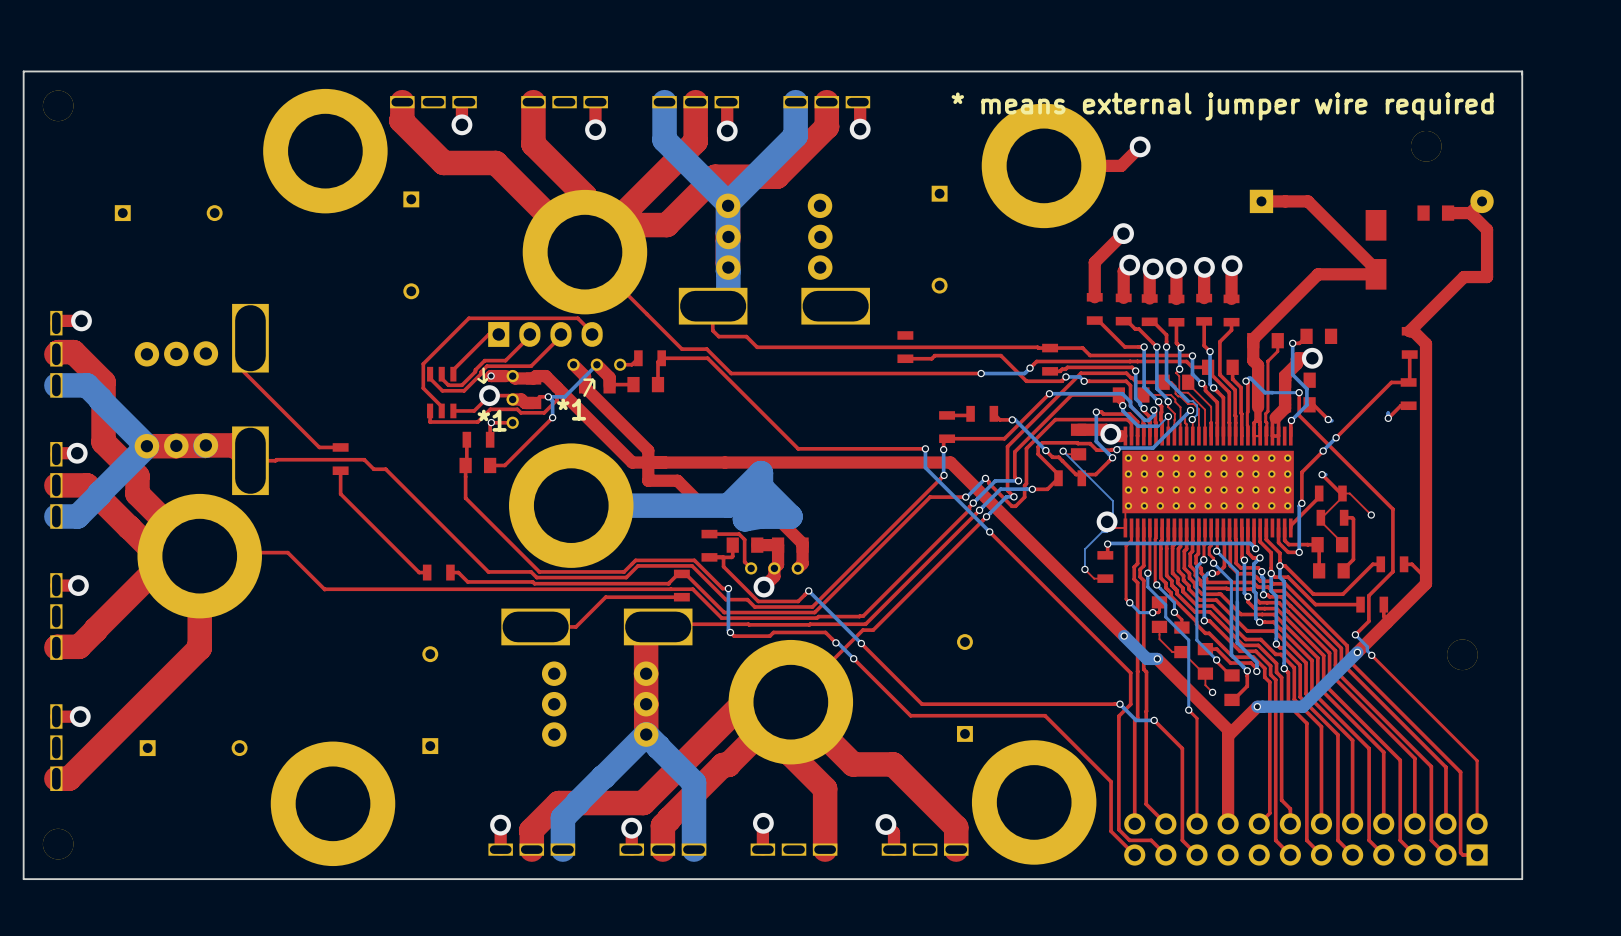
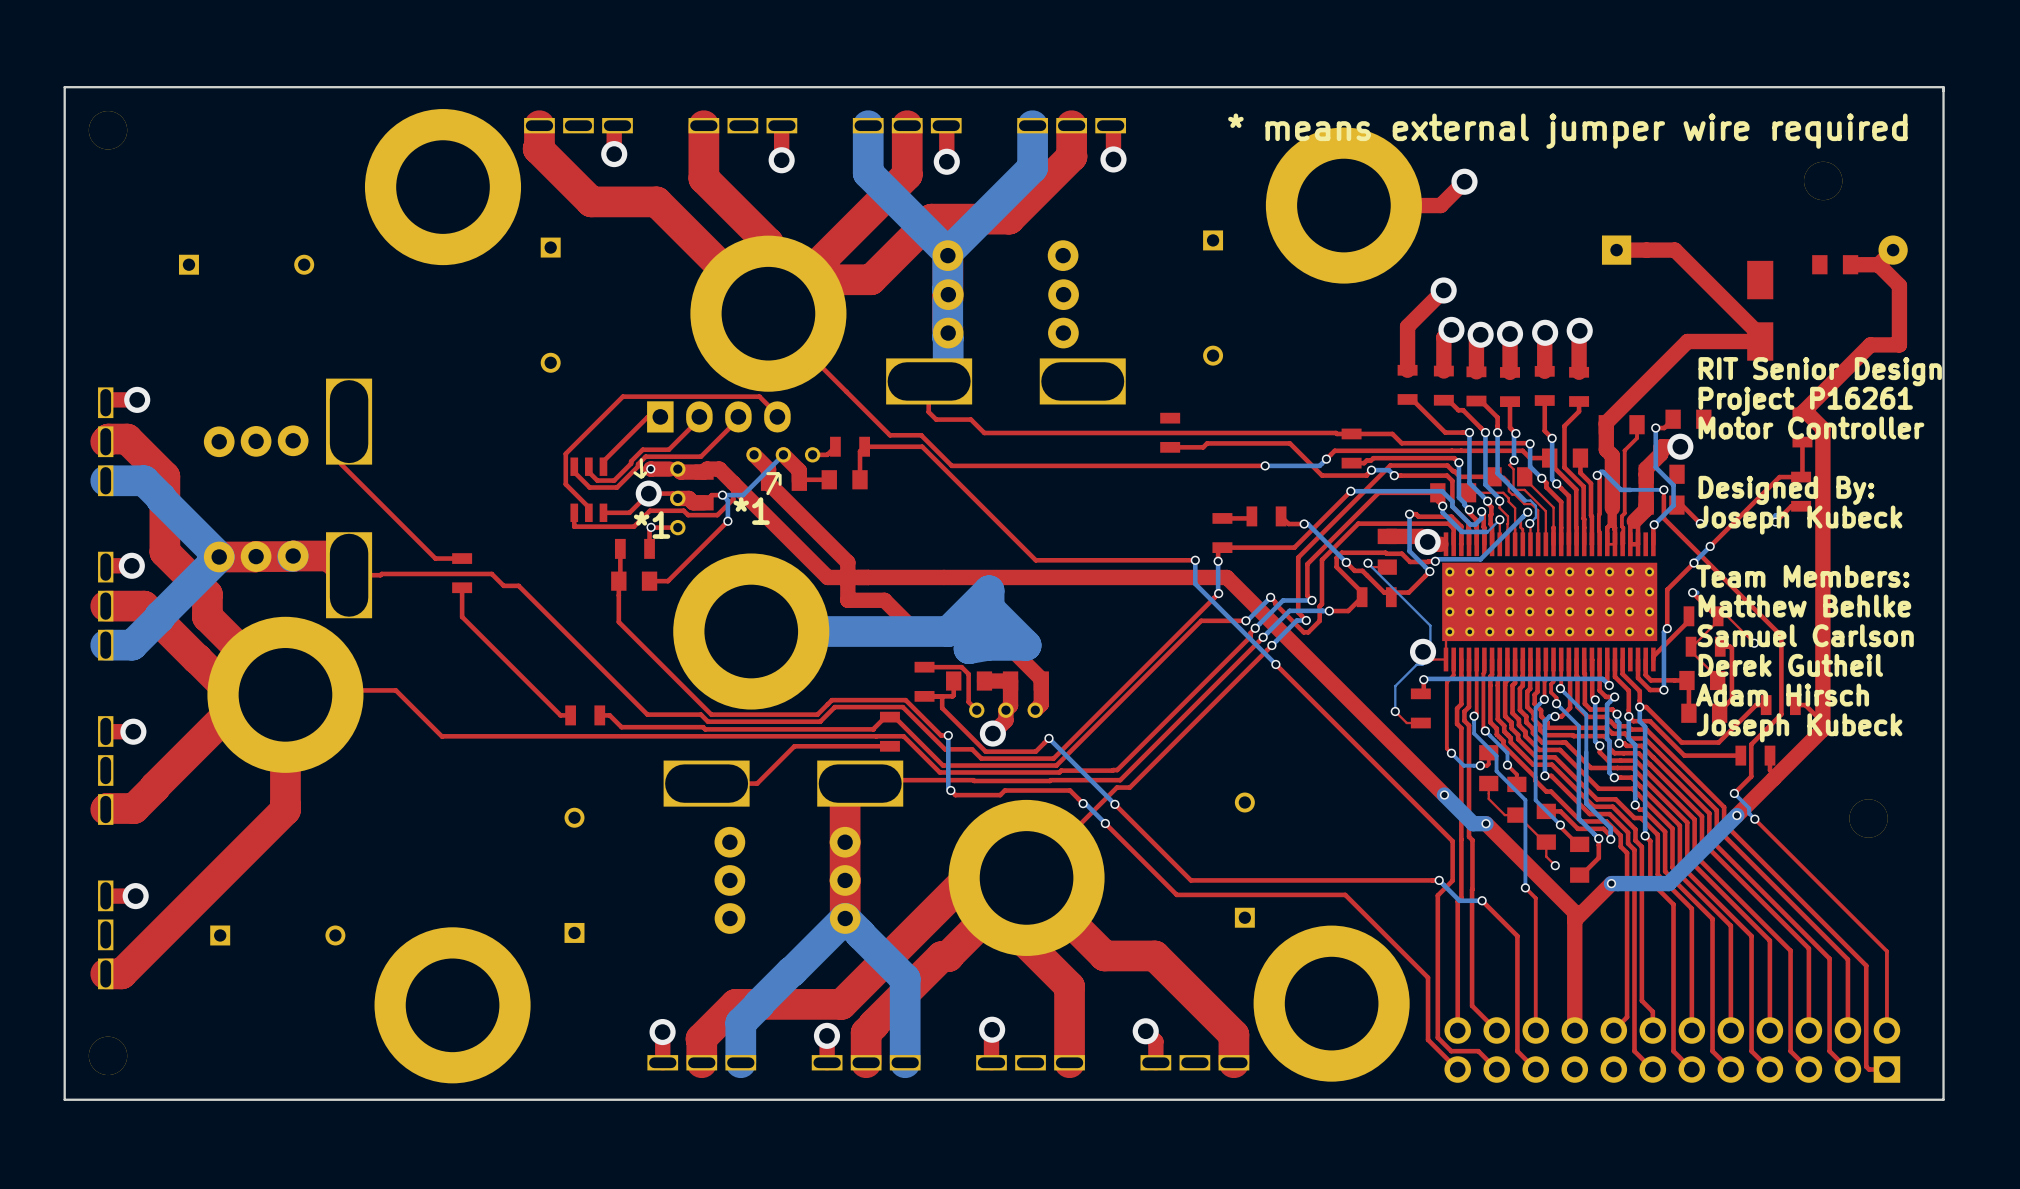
text: none -> RIT Senior Design (1820, 371)
text: none -> Project P16261 (1805, 401)
text: none -> Motor Controller (1811, 427)
text: none -> Designed By: (1786, 490)
text: none -> Joseph Kubeck (1799, 520)
text: none -> Team Members: (1802, 576)
text: none -> Matthew Behlke (1804, 606)
text: none -> Samuel Carlson (1805, 635)
text: none -> Derek Gutheil (1790, 665)
text: none -> Adam Hirsch (1782, 695)
text: none -> Joseph Kubeck (1799, 727)

